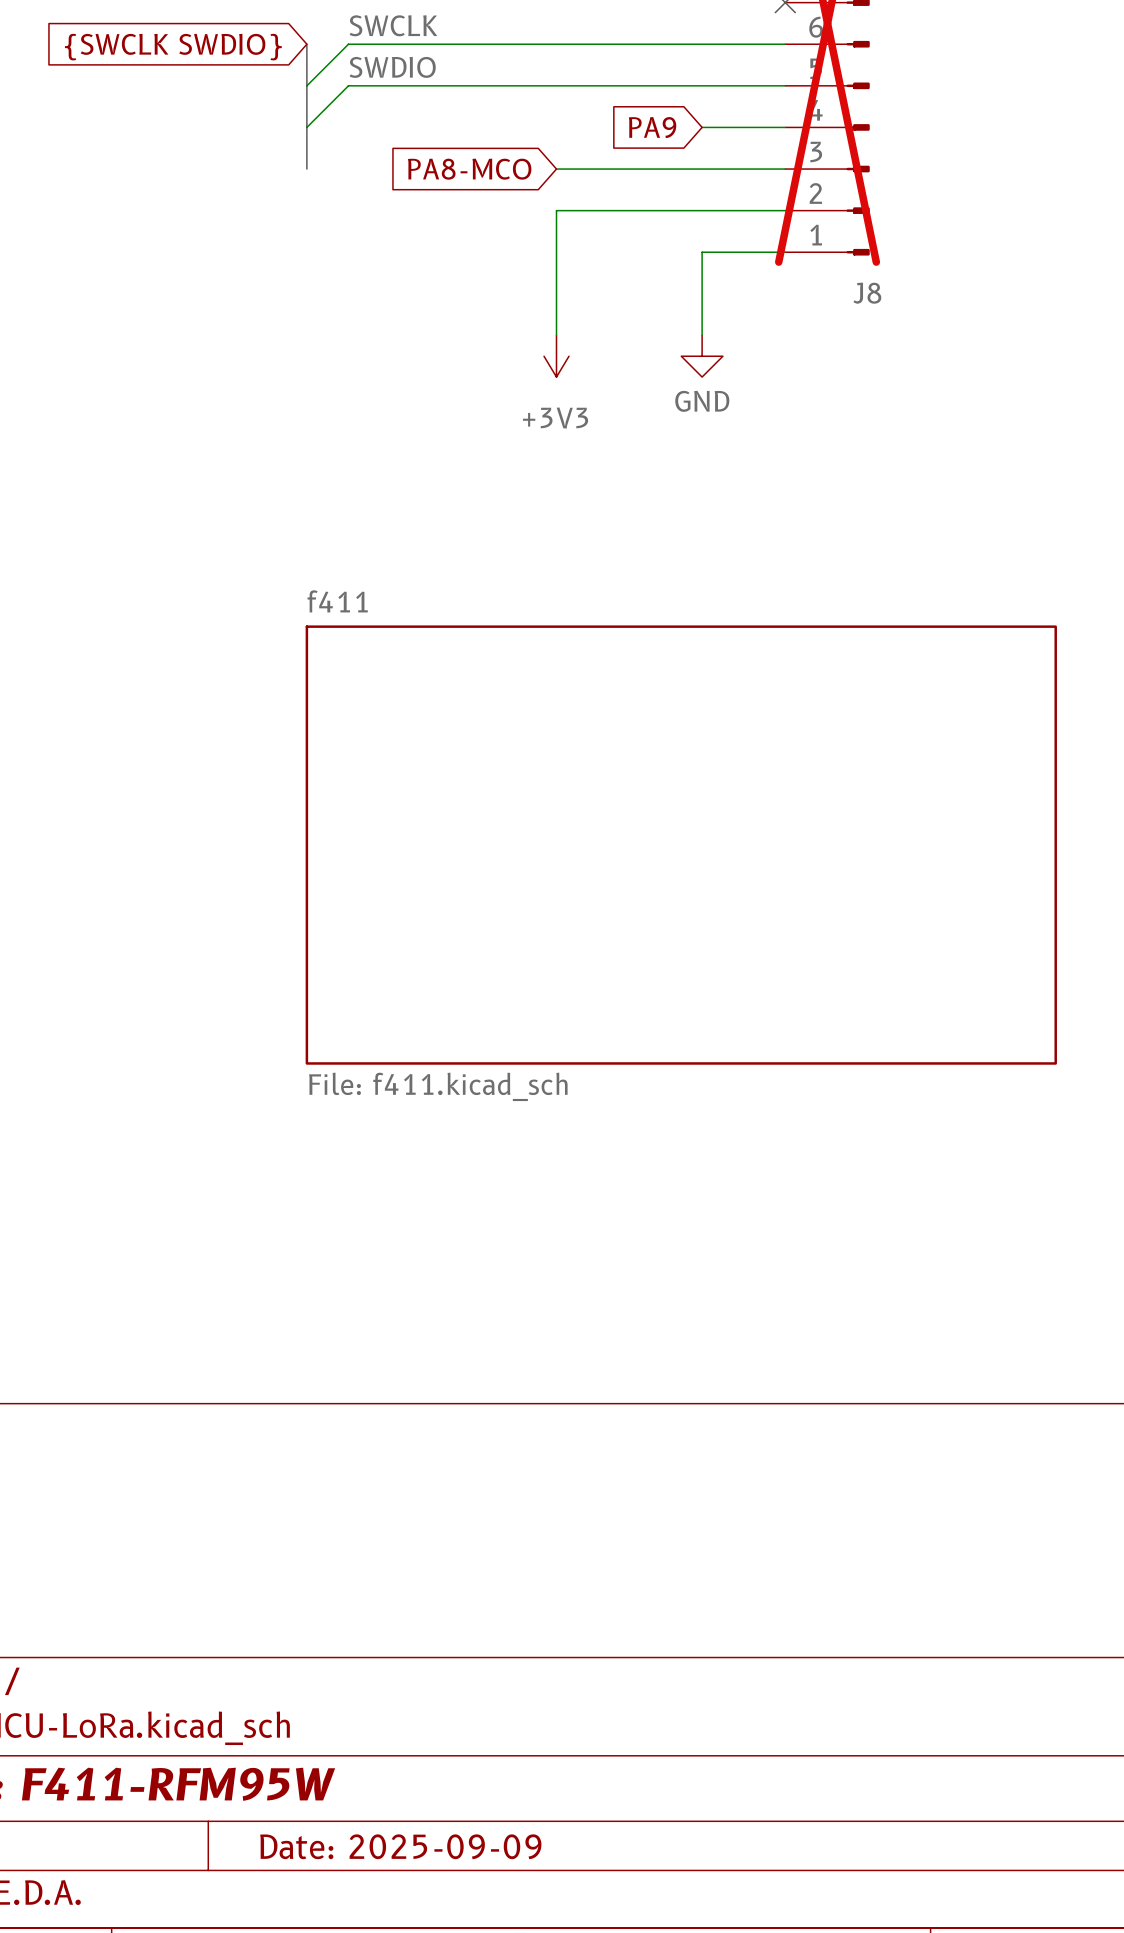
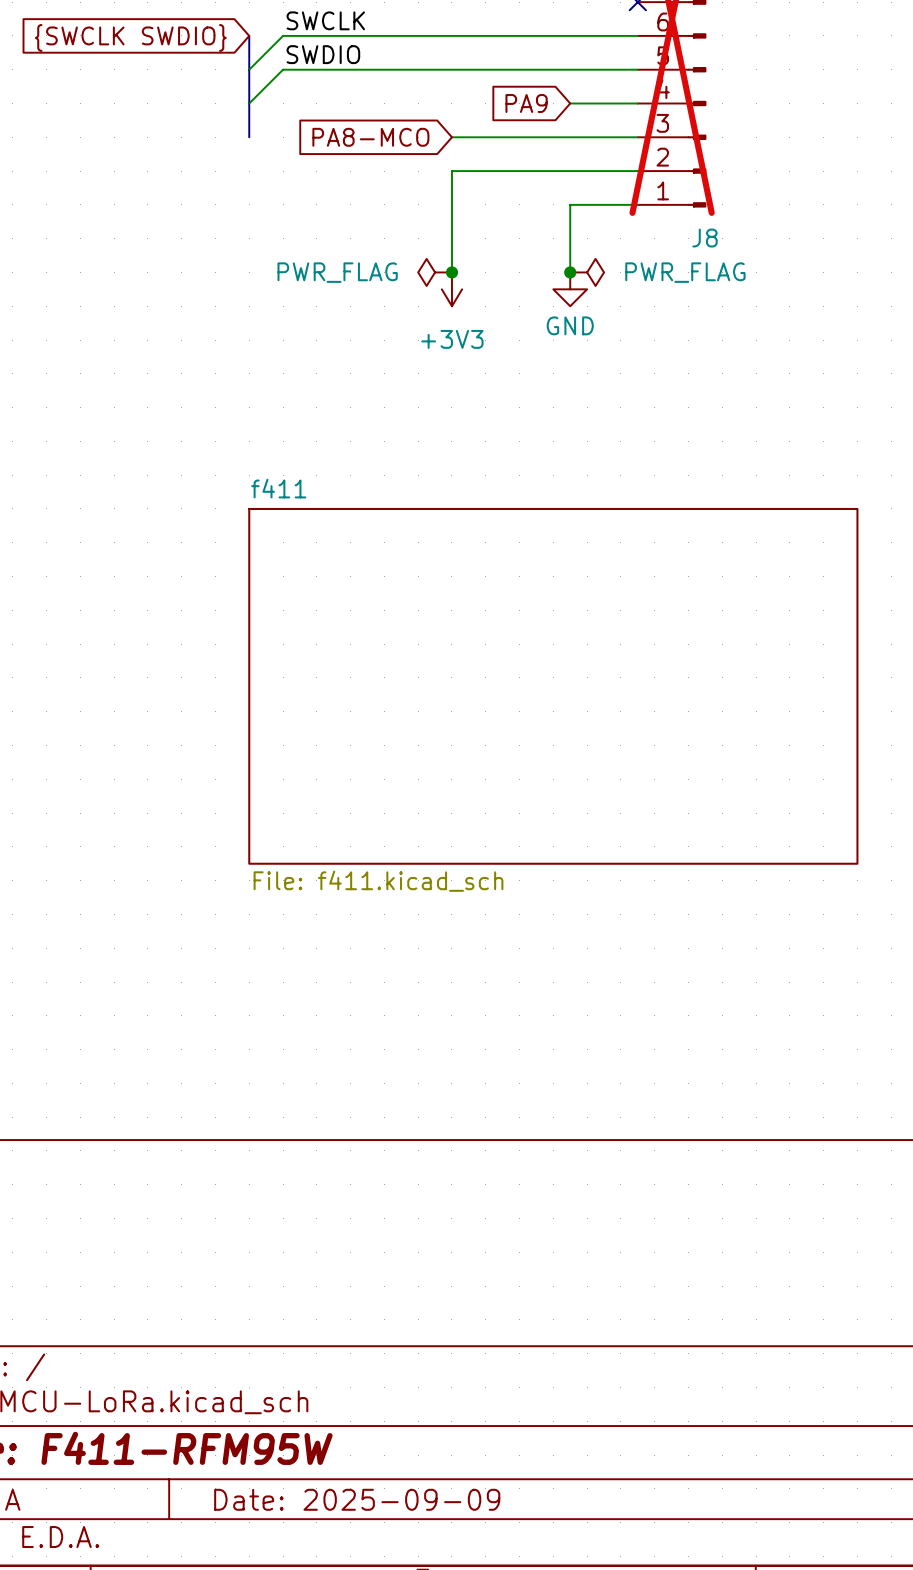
power symbol: none -> PWR_FLAG (435, 272)
junction: none -> (451, 272)
junction: none -> (570, 272)
power symbol: none -> PWR_FLAG (587, 272)

